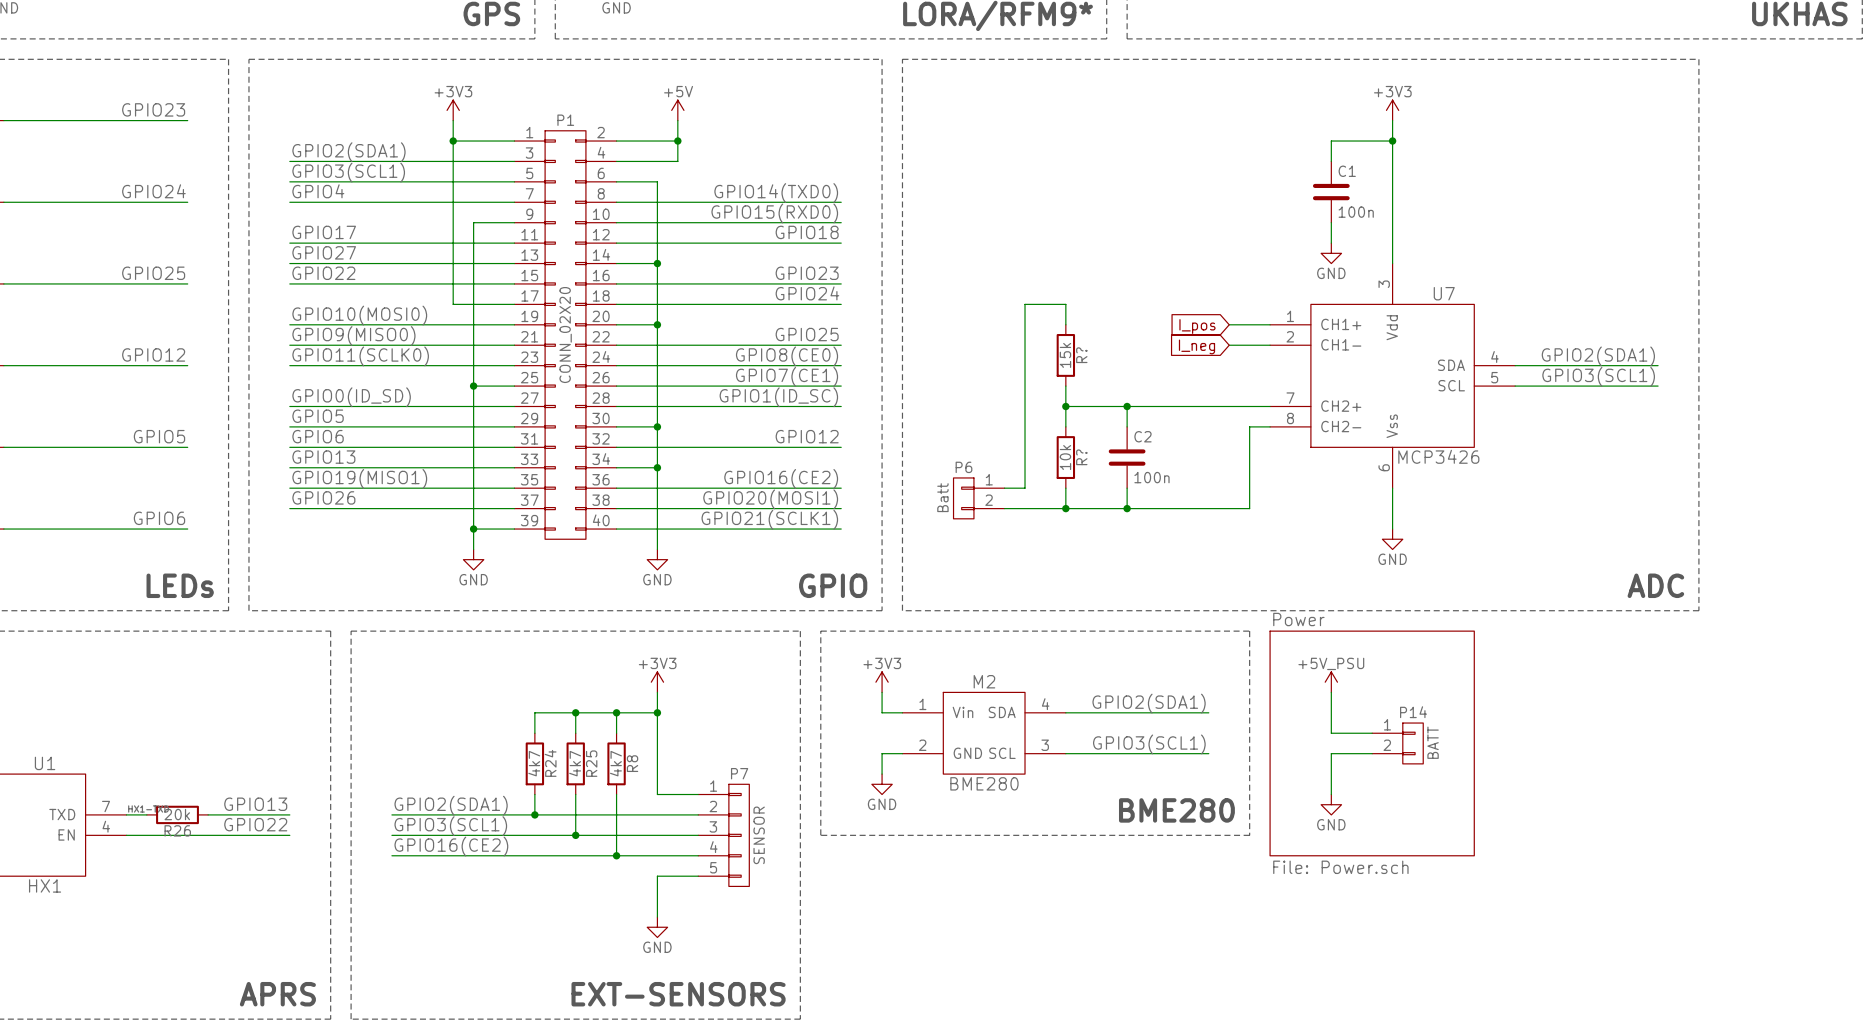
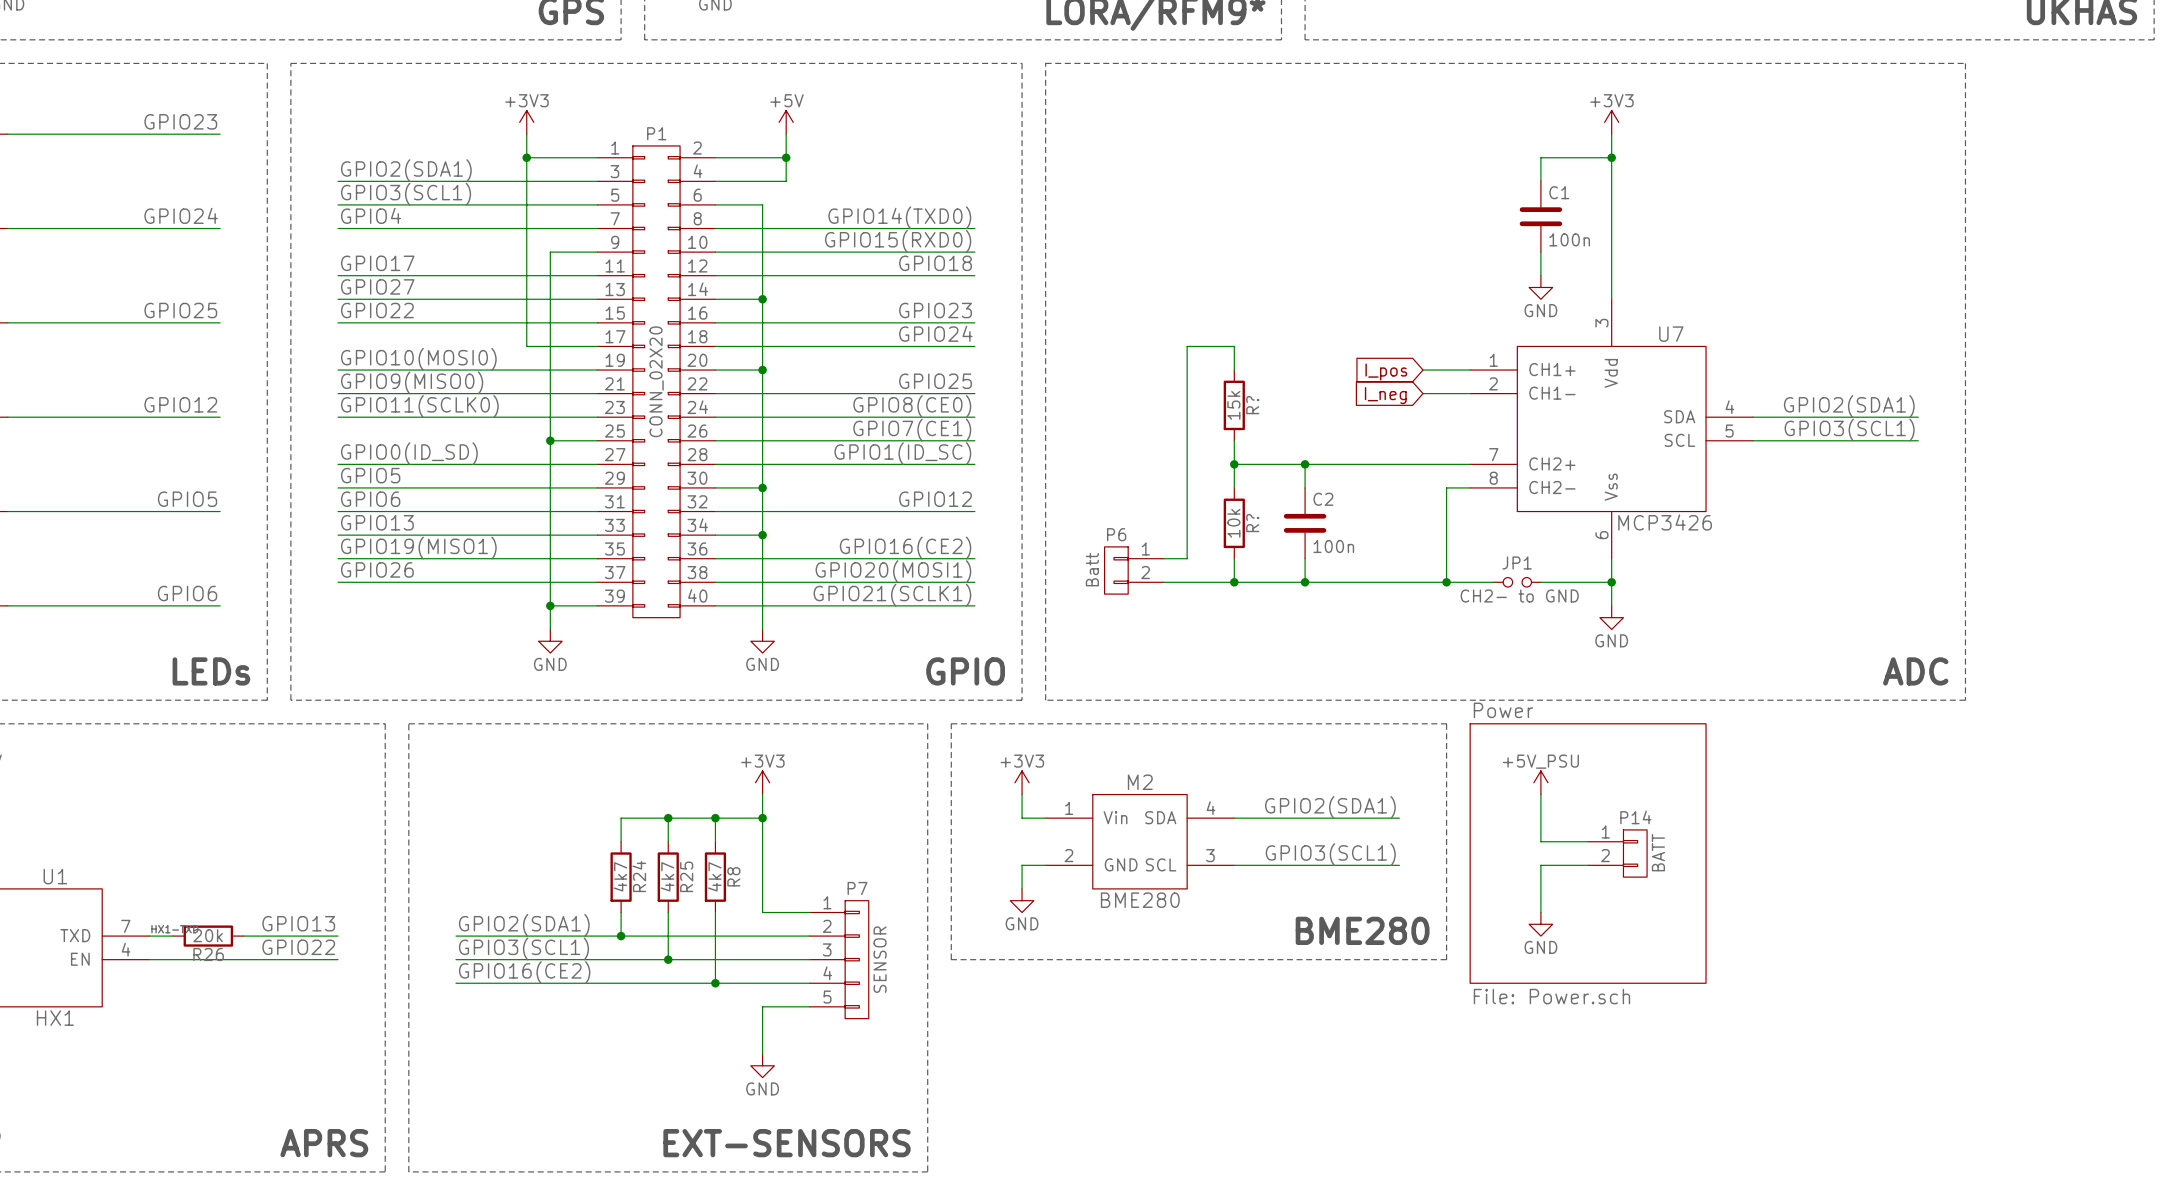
wire: none -> (1446, 582) (1493, 582)
junction: none -> (1446, 582)
JP1: none -> CH2- to GND (1517, 582)
wire: none -> (1540, 582) (1611, 582)
junction: none -> (1611, 582)

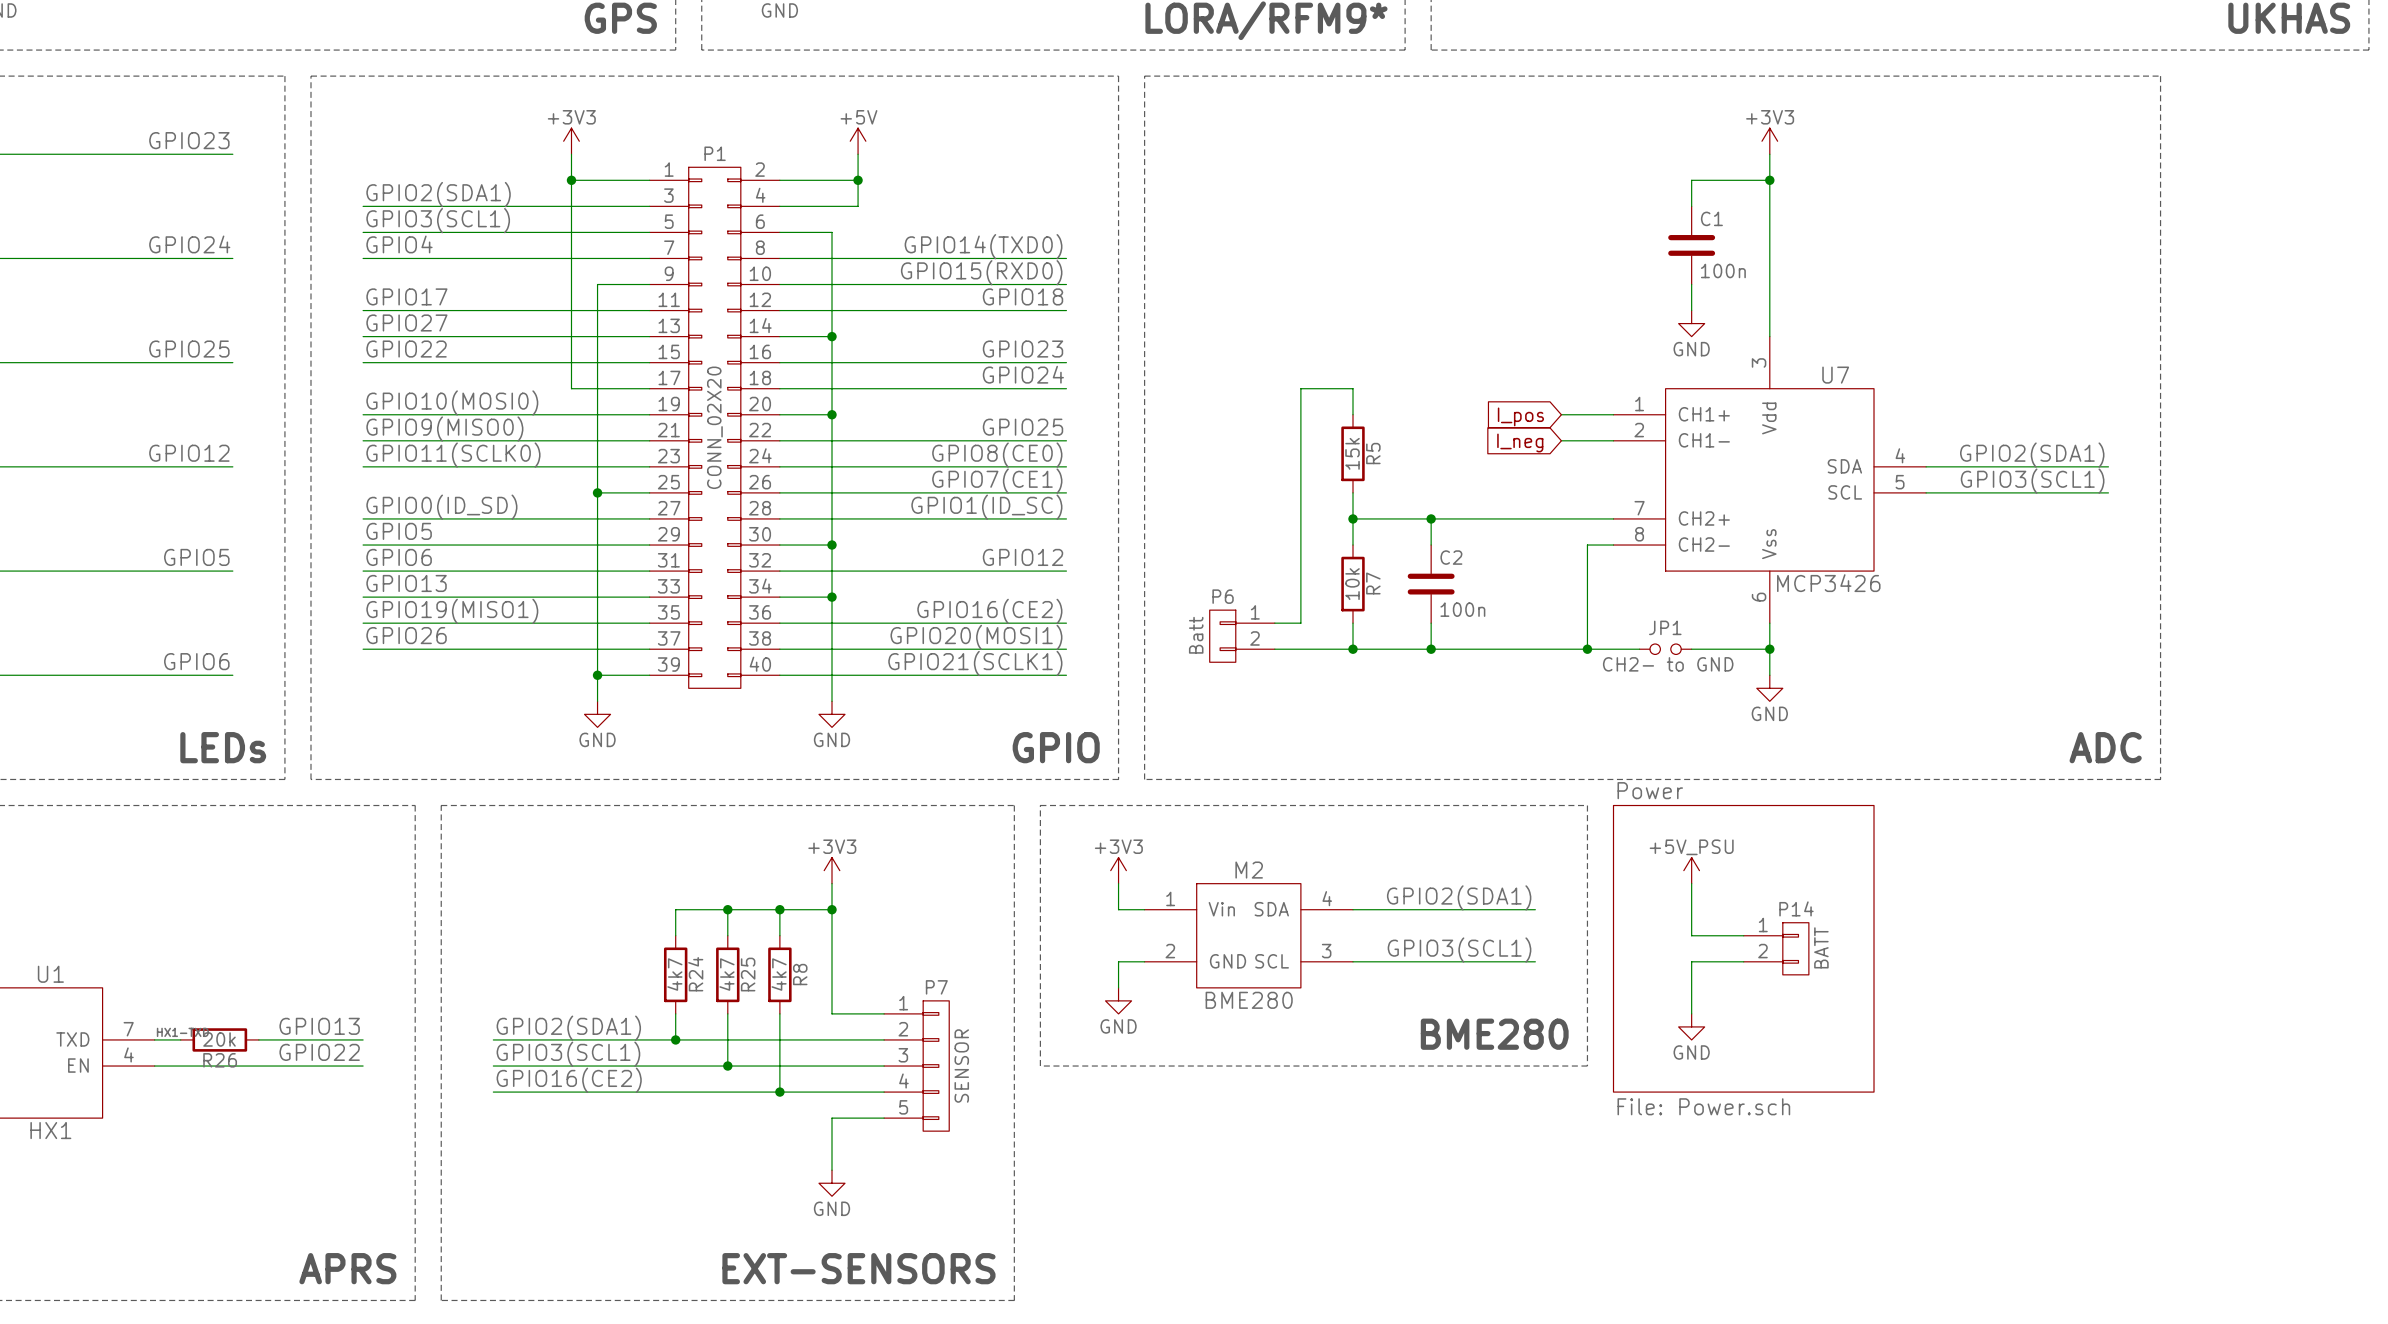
R? name: R? (1252, 405) -> R5 (1373, 453)
R? name: R? (1252, 523) -> R7 (1373, 583)

